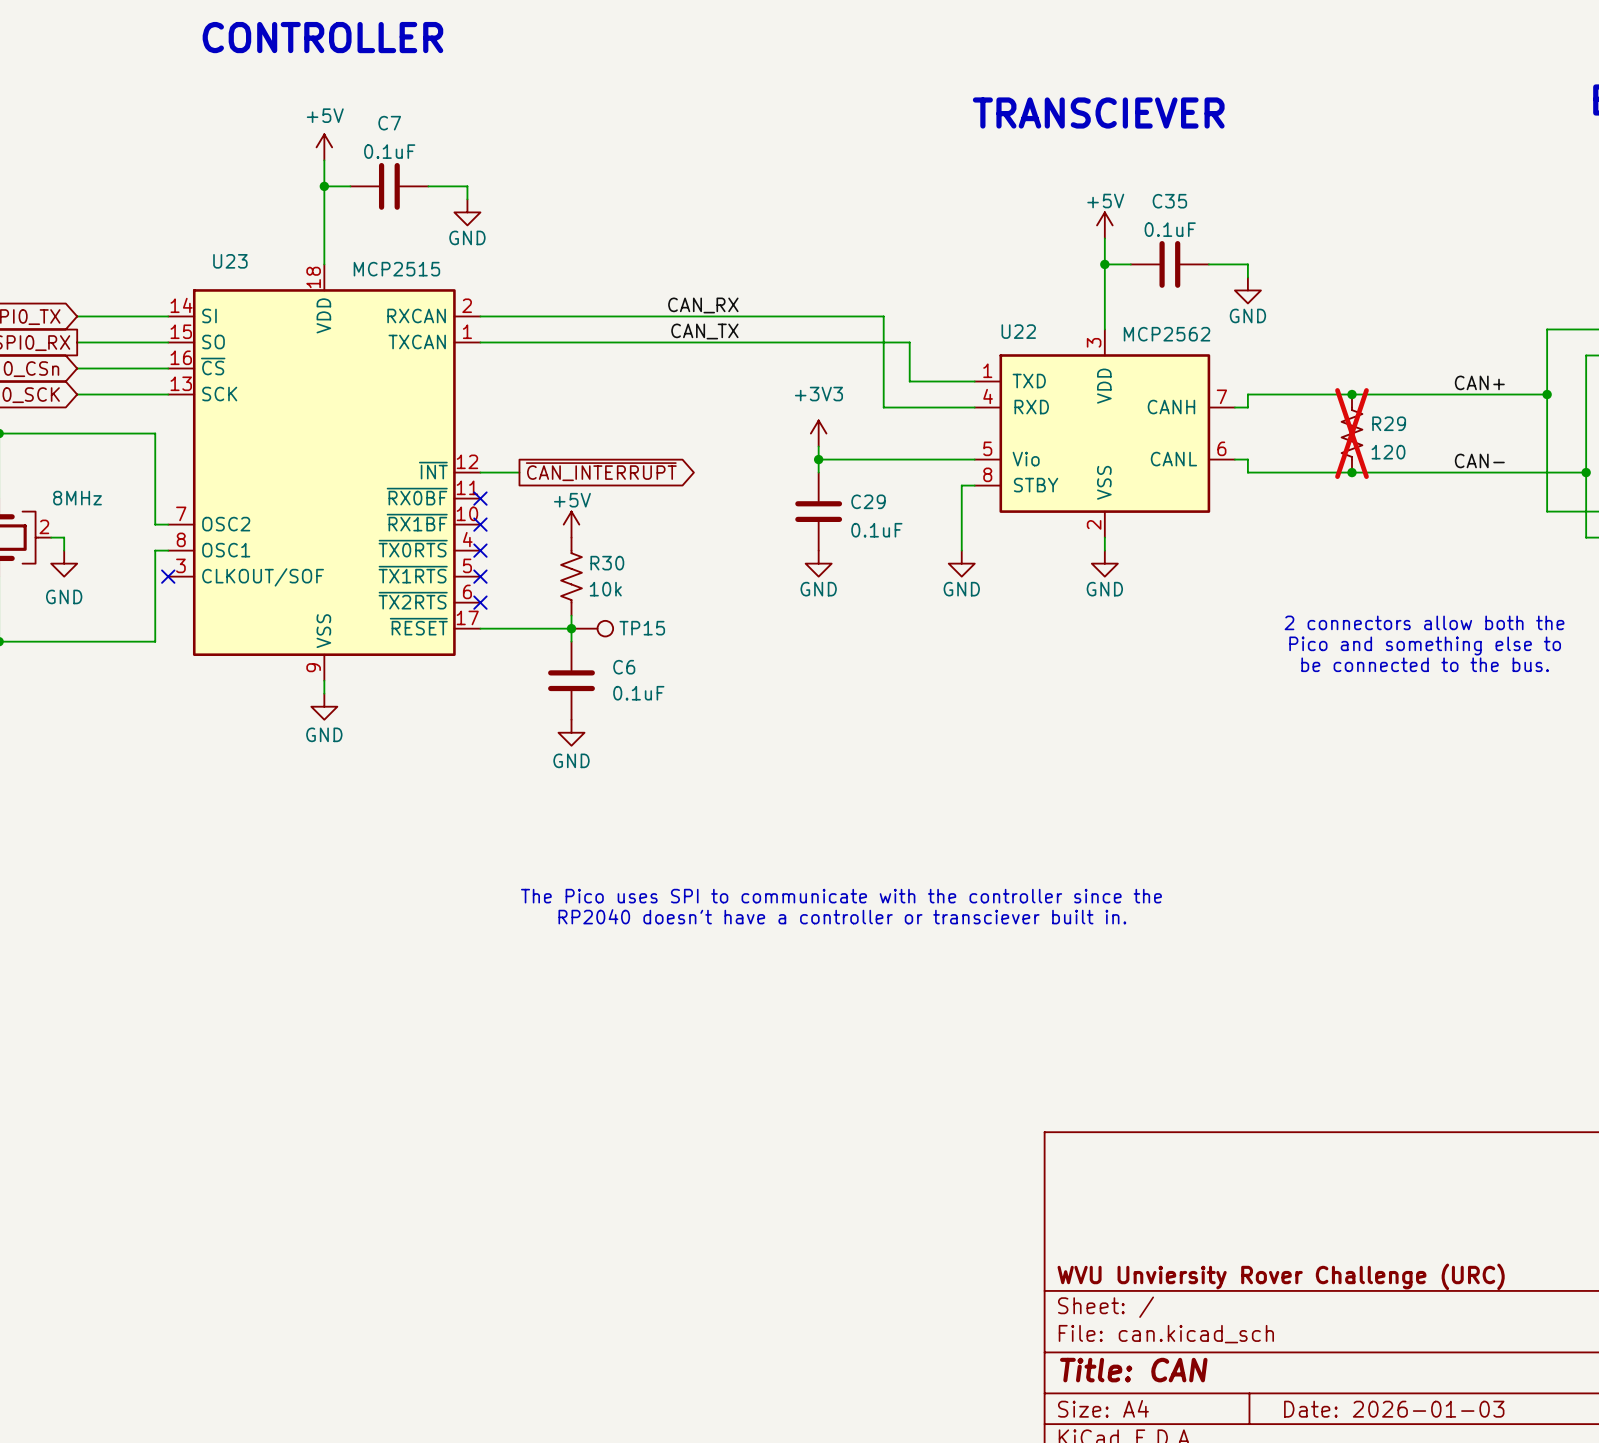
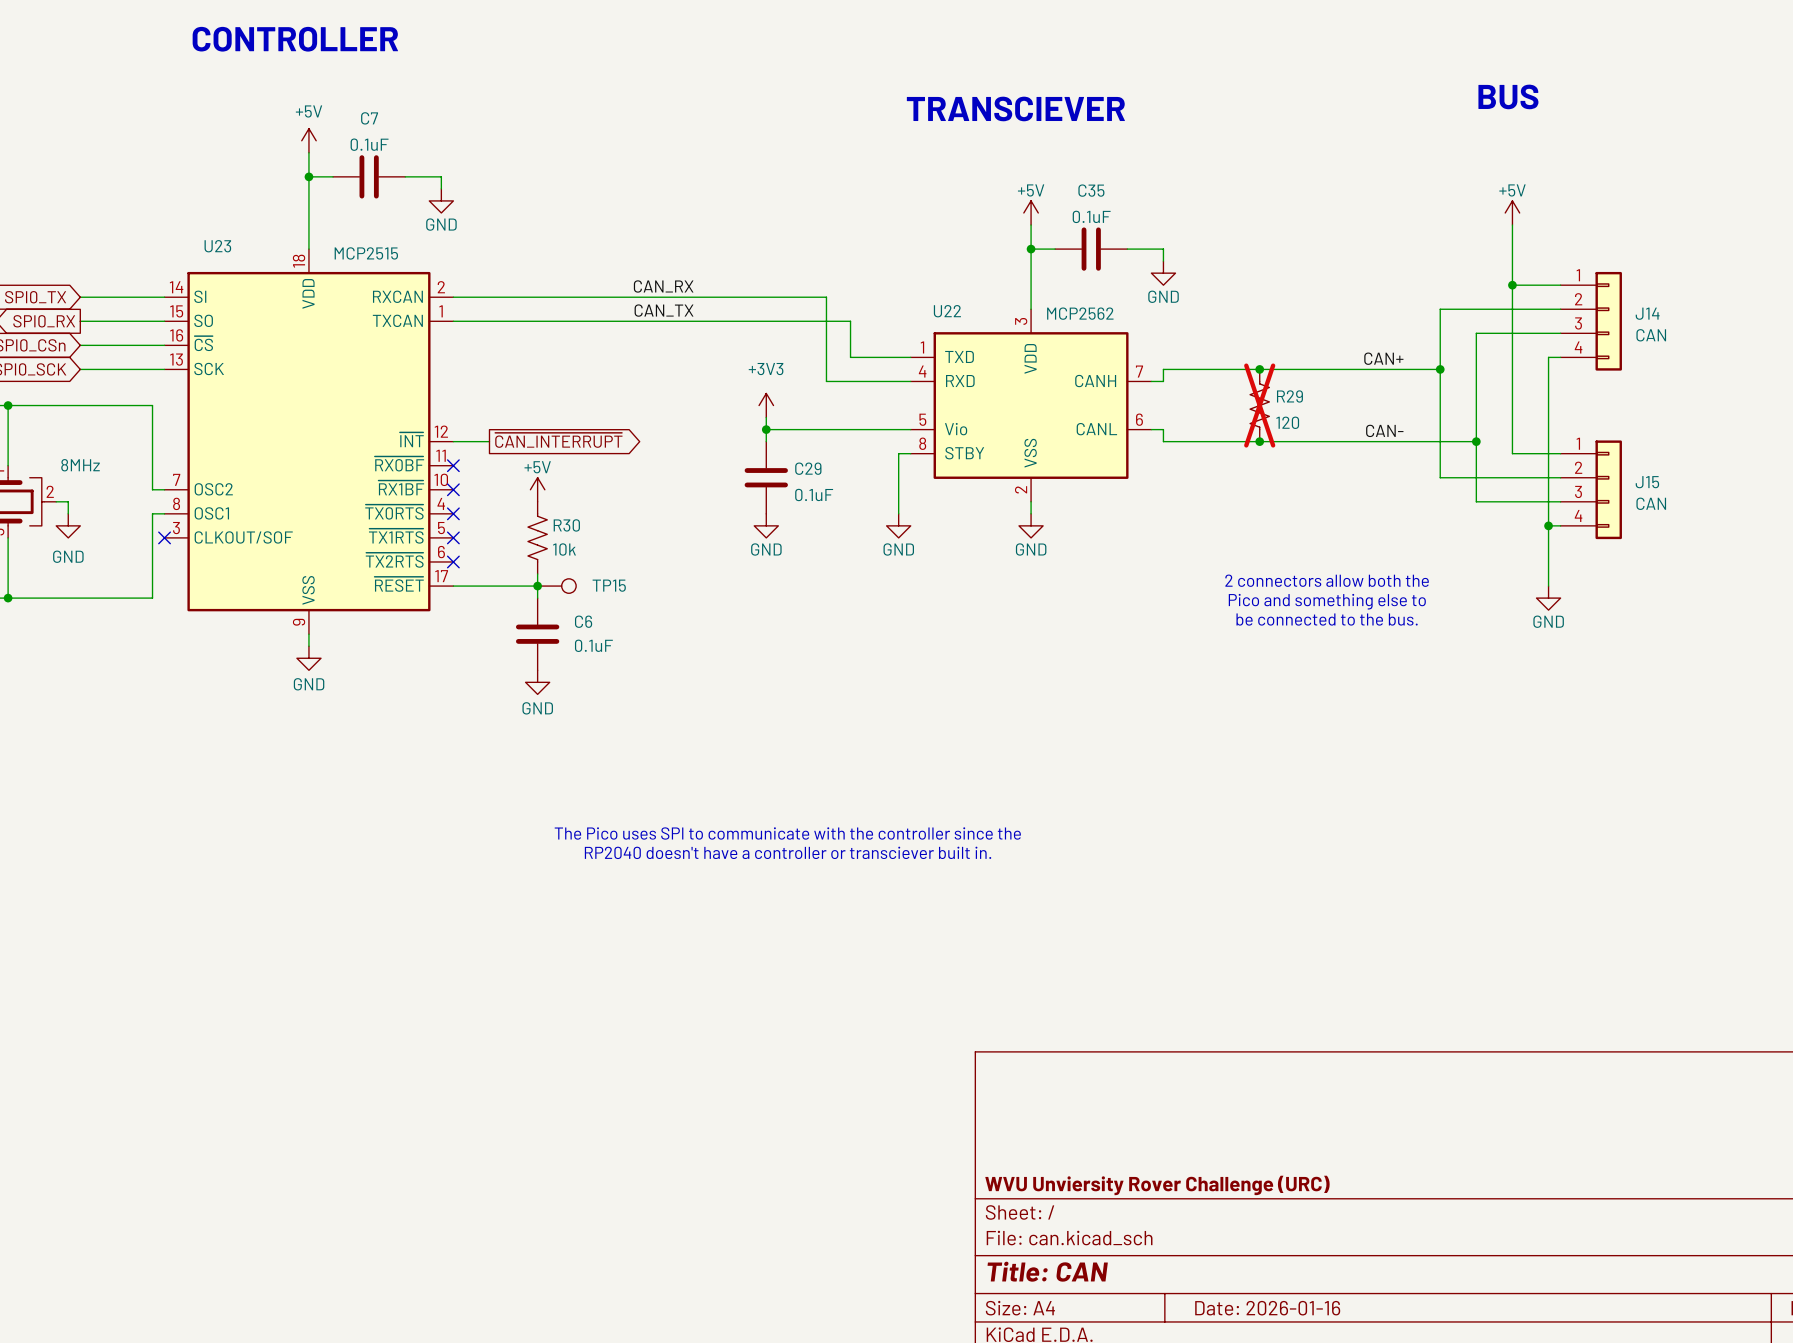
title block: Date: 2026-01-03 (1394, 1409) -> Date: 2026-01-16 (1267, 1308)

